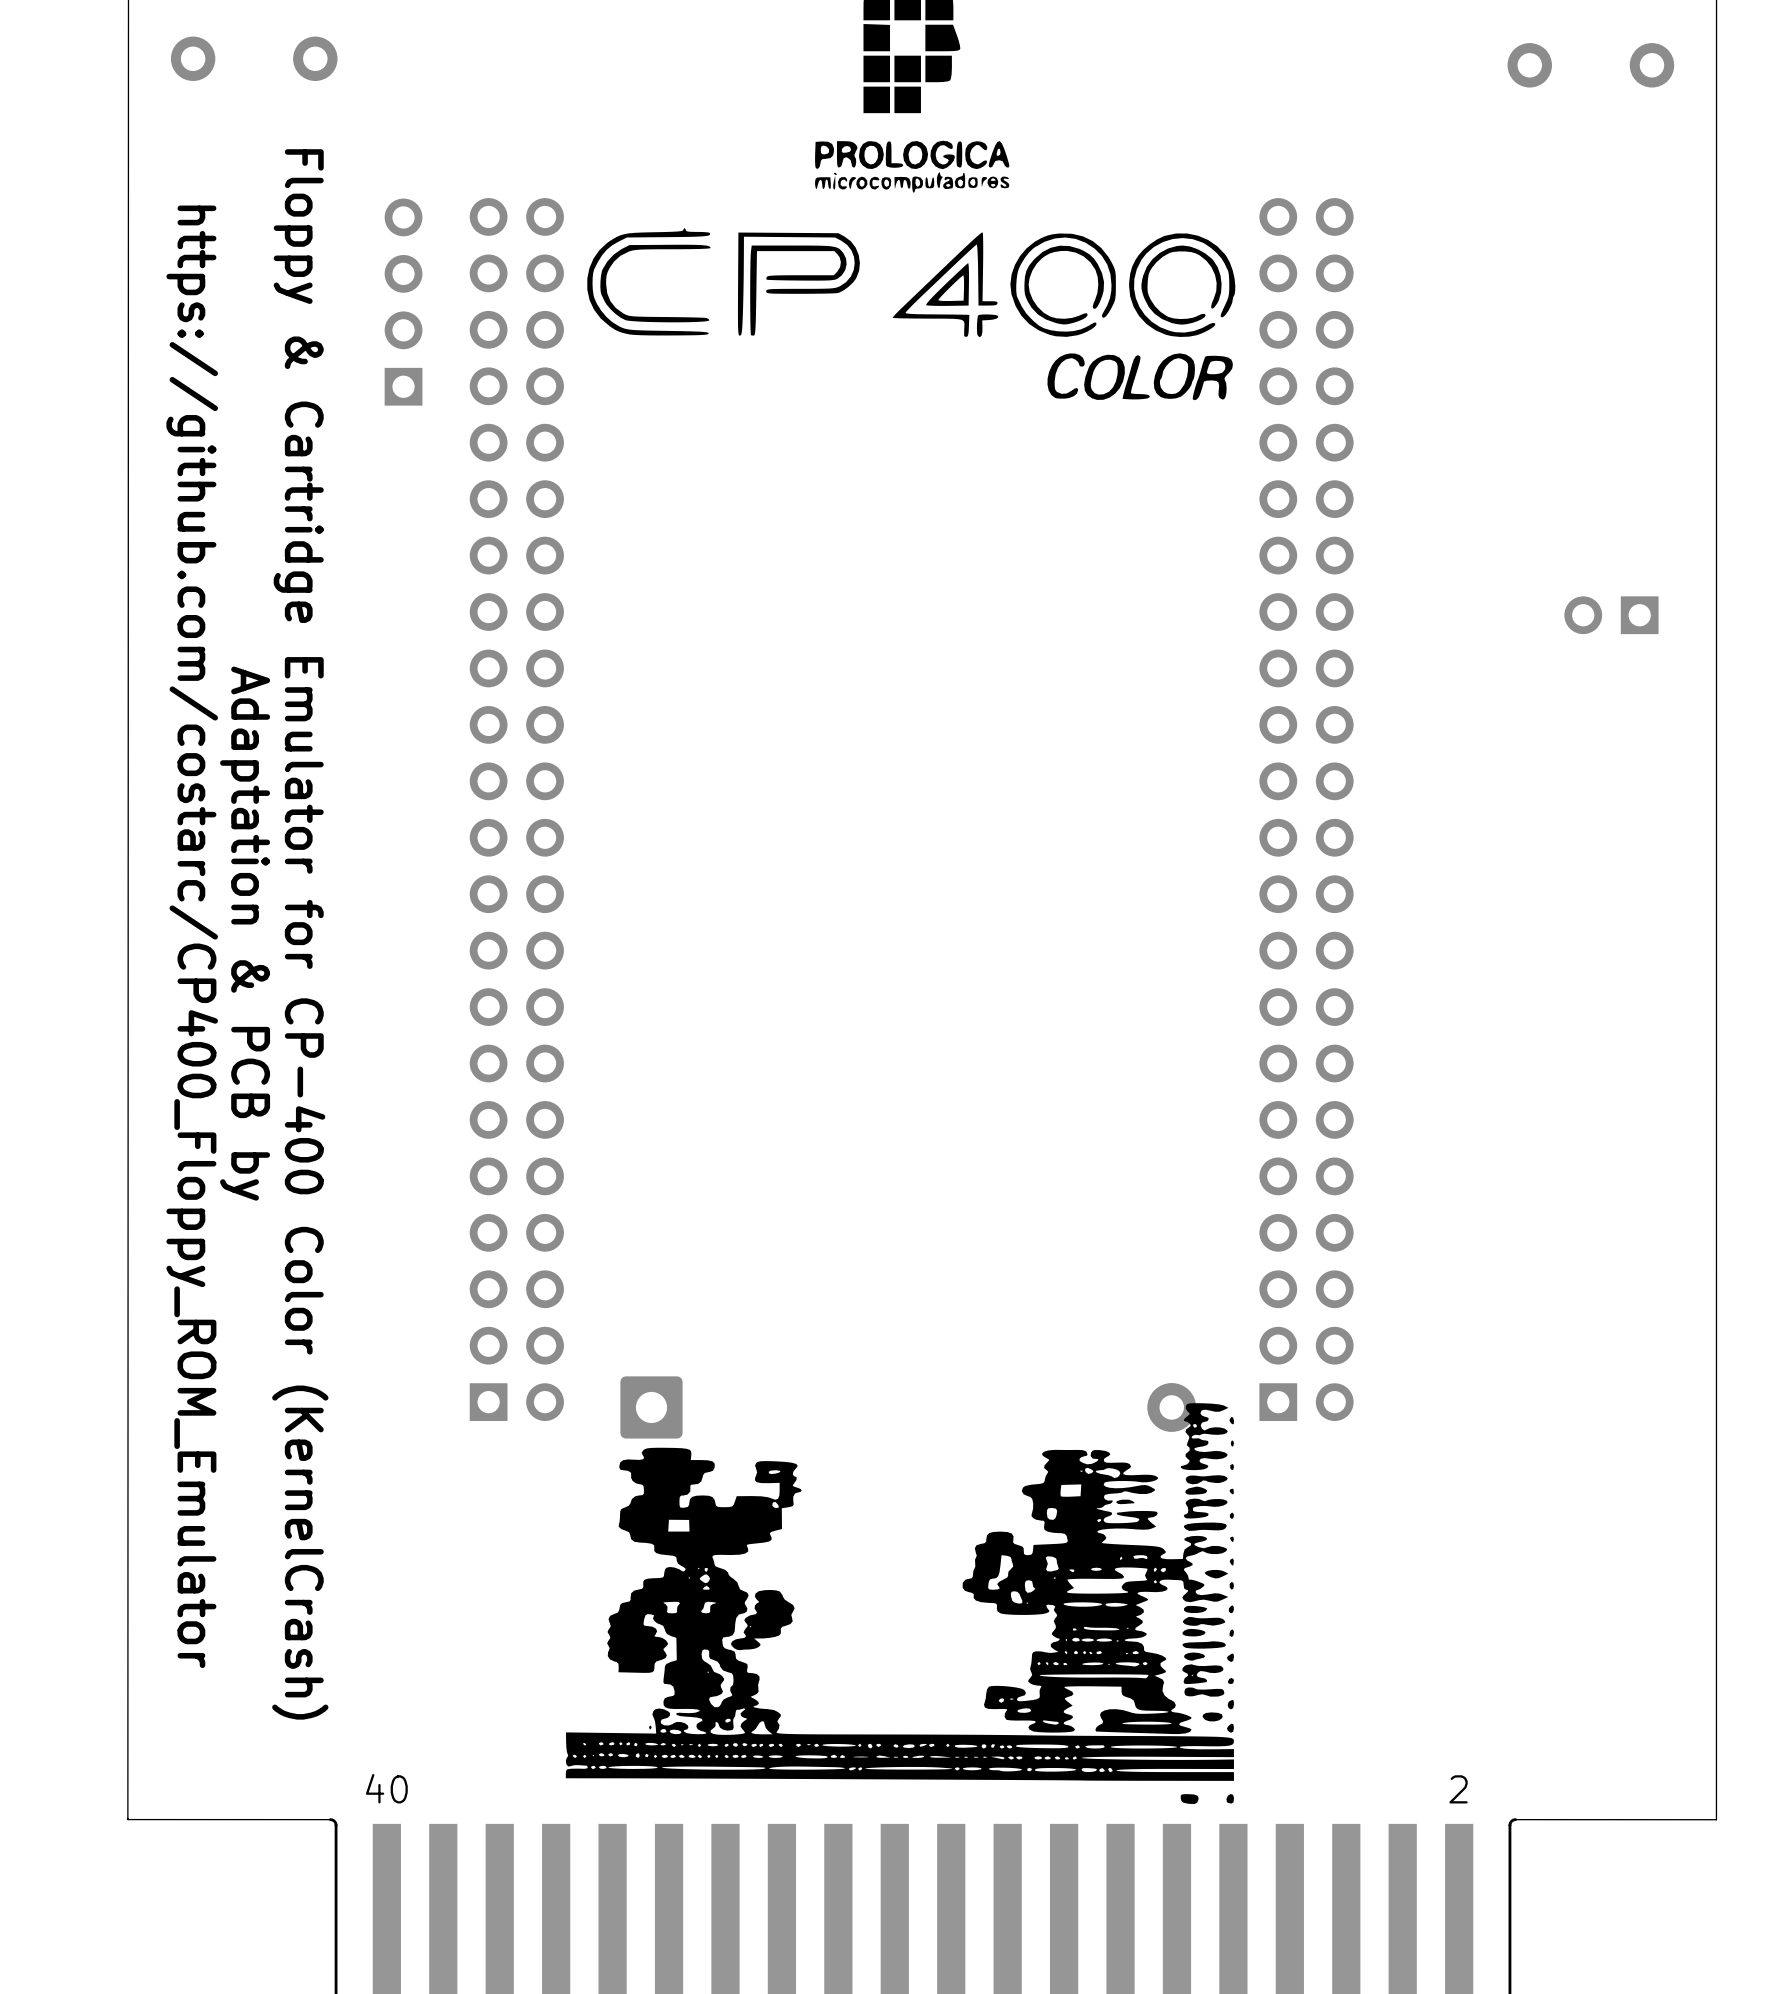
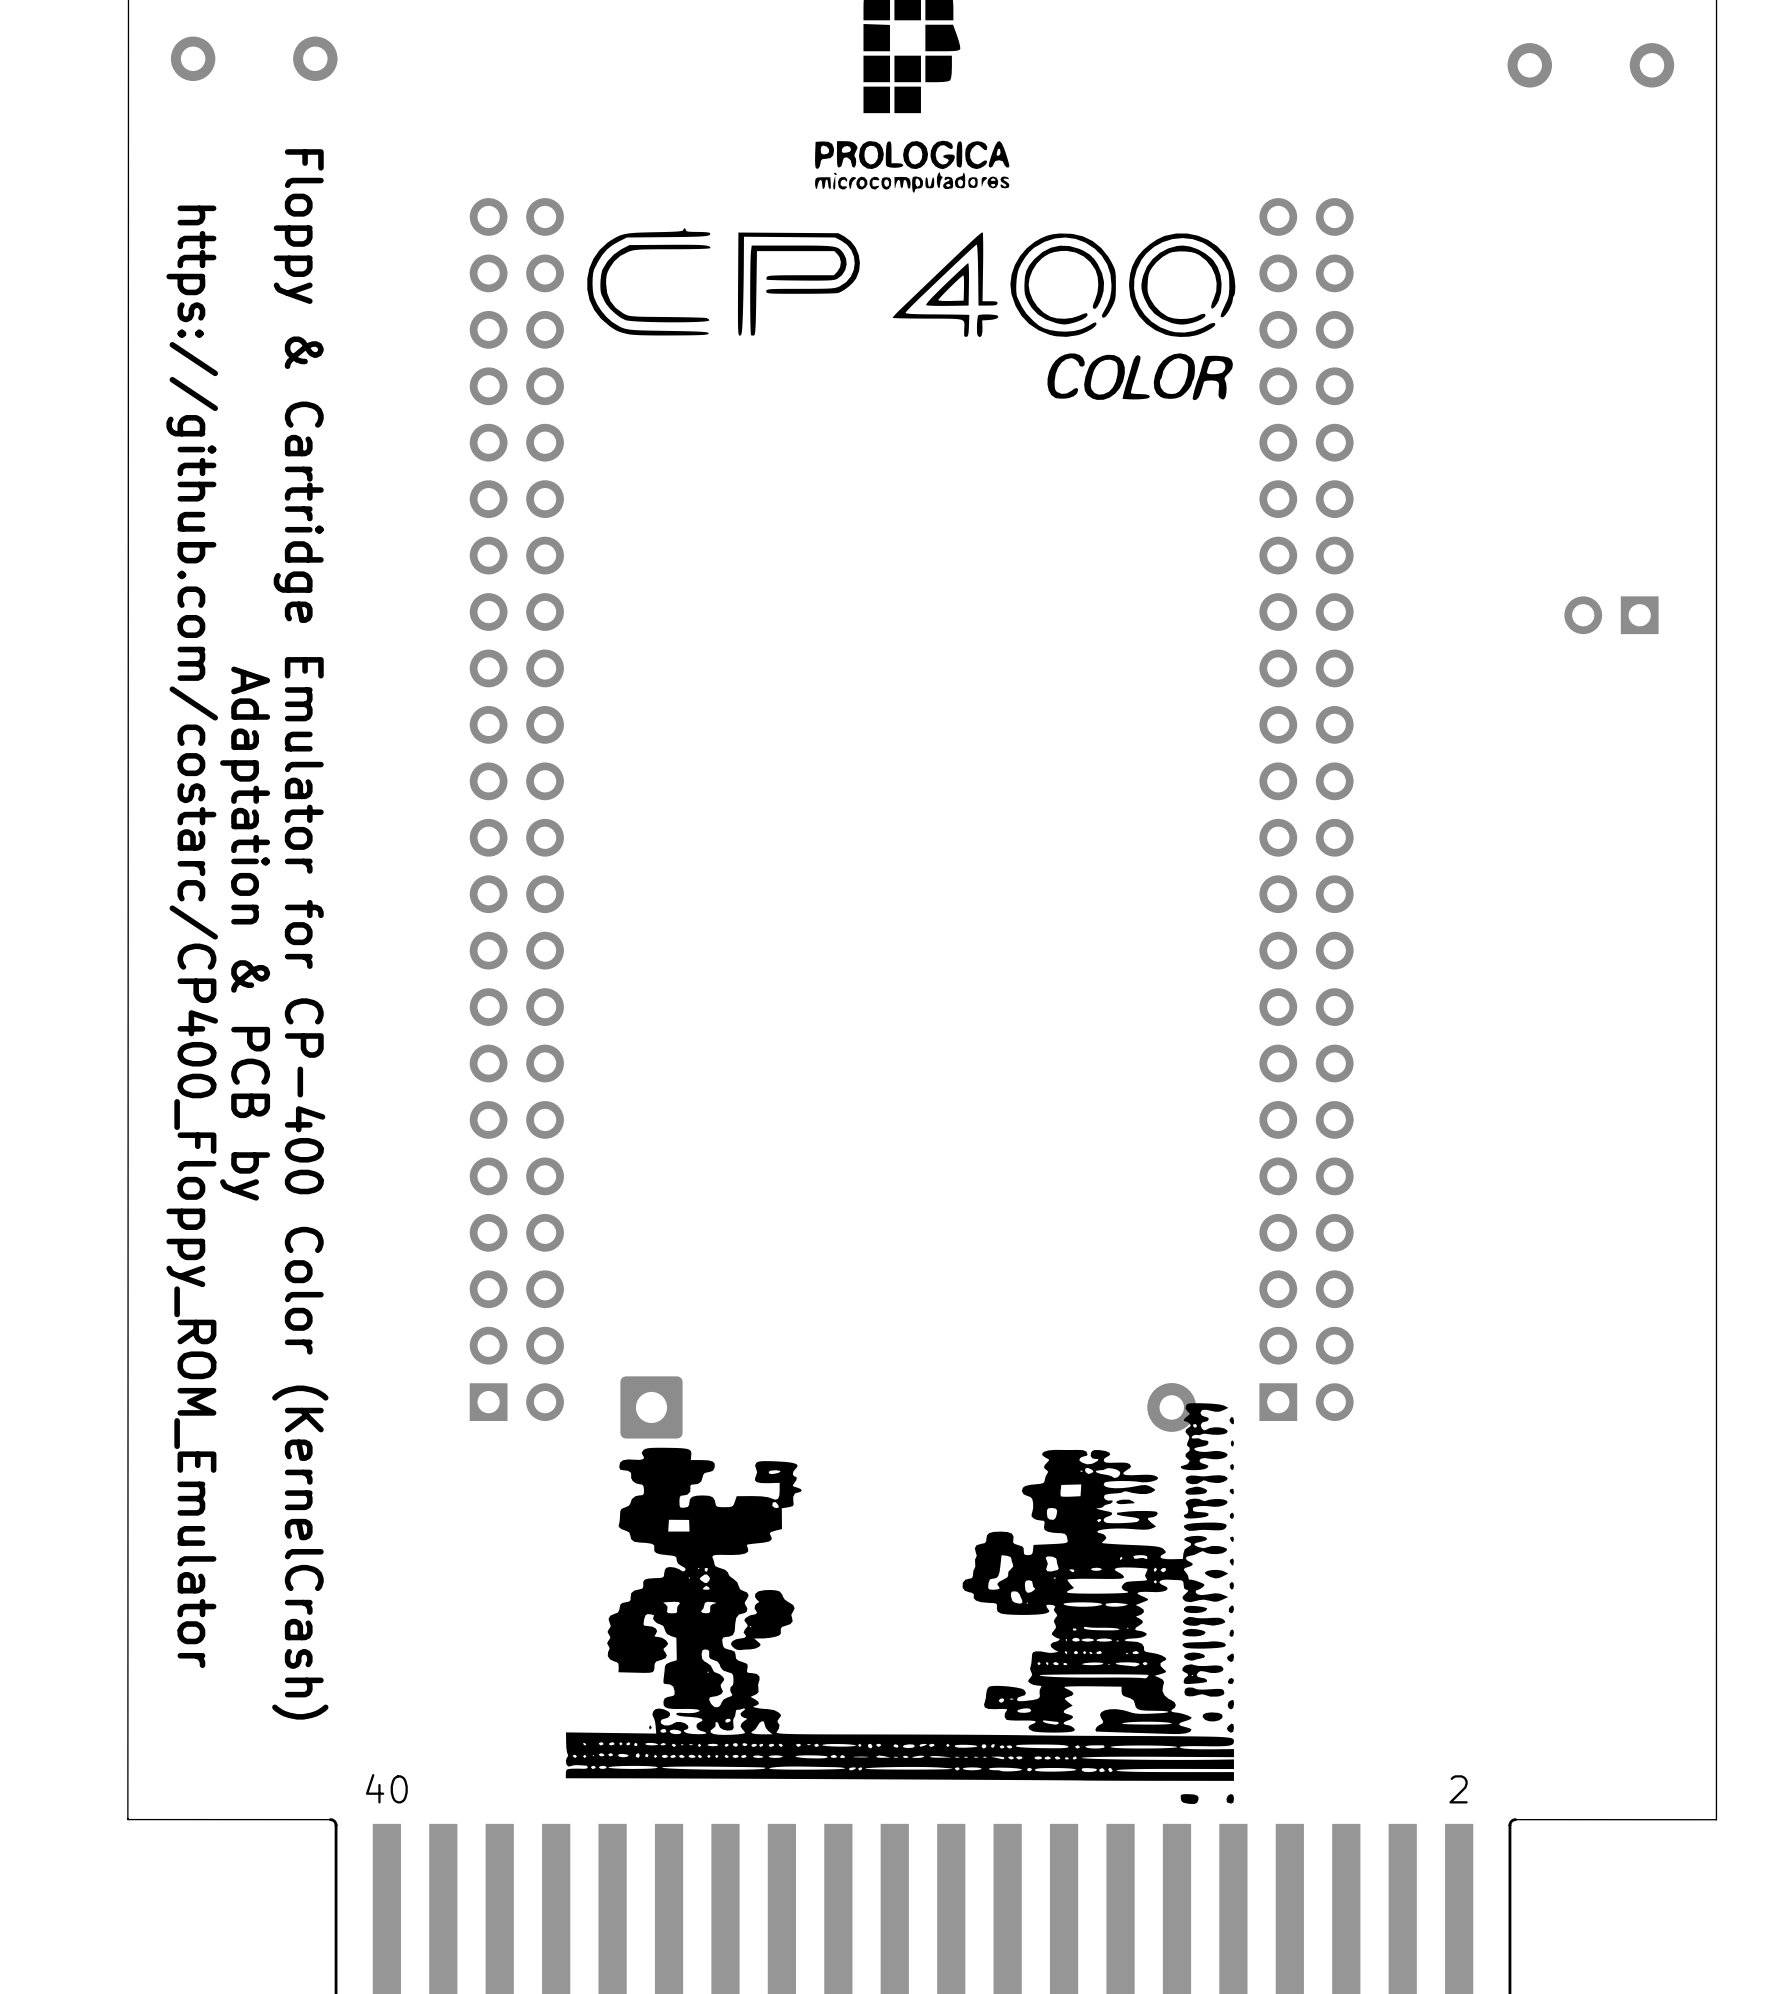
part: (403, 302) -> none

